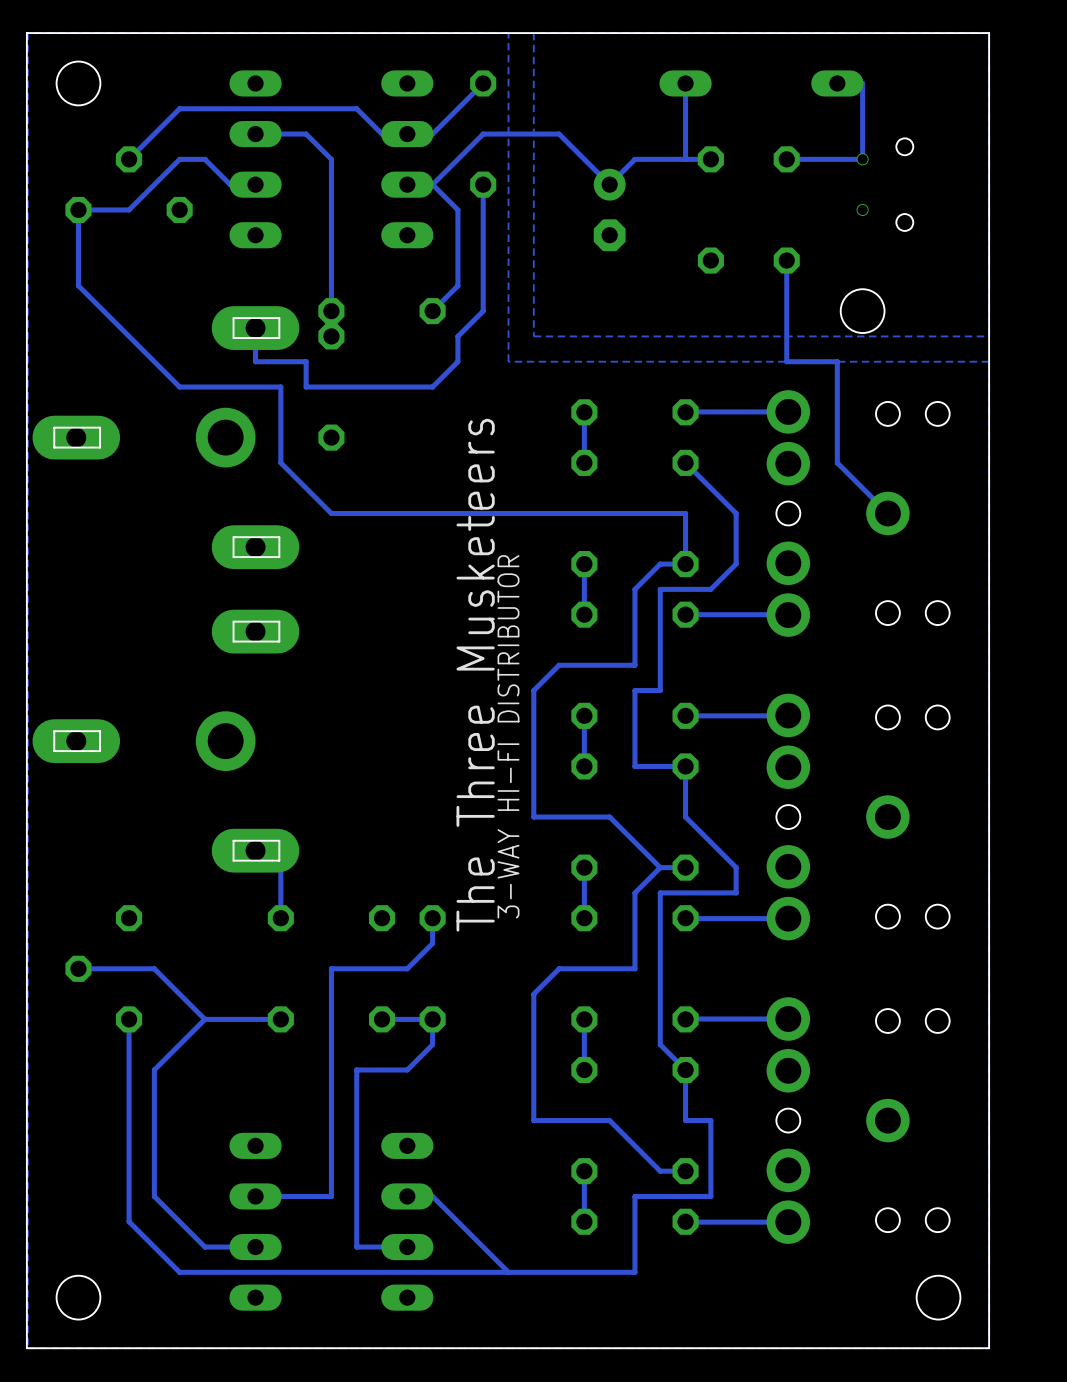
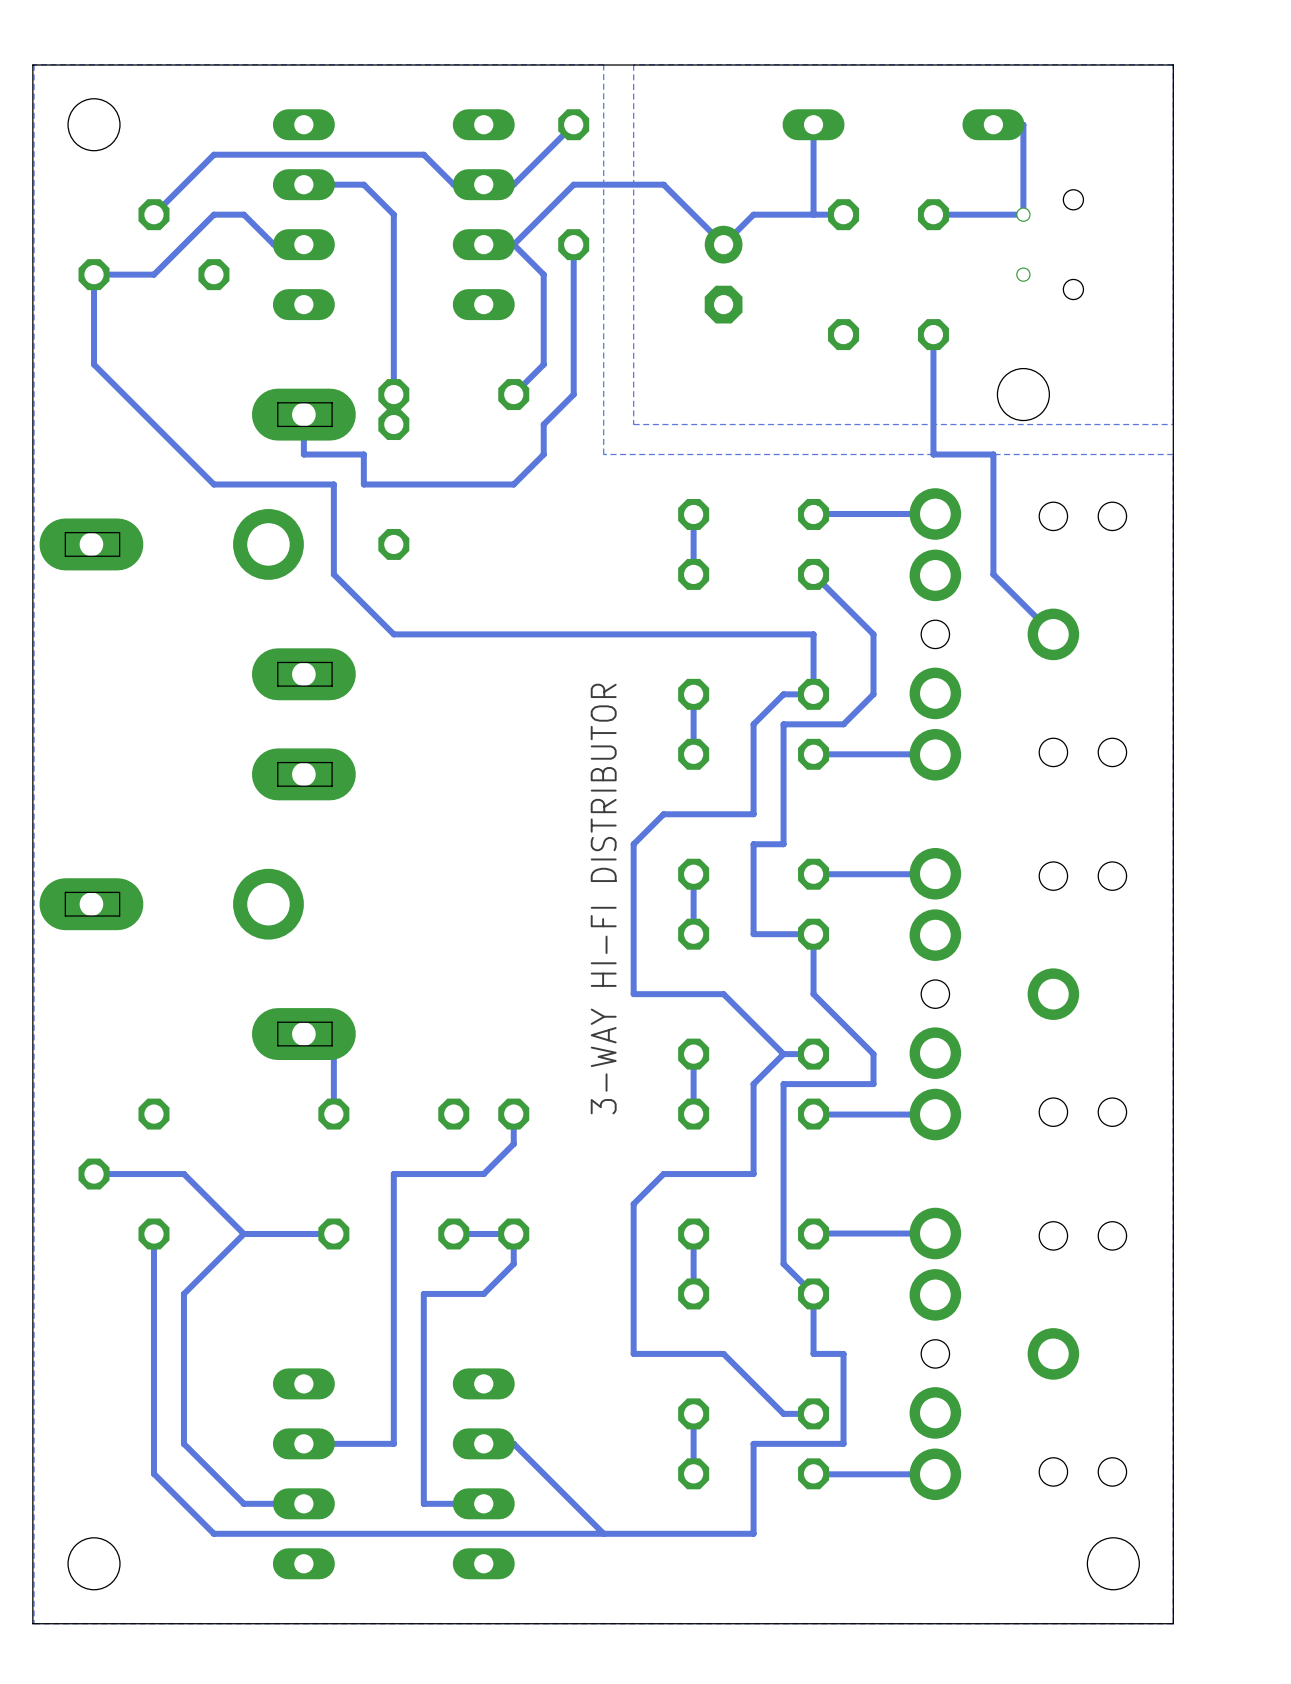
text: The Three Musketeers (475, 675) -> none

